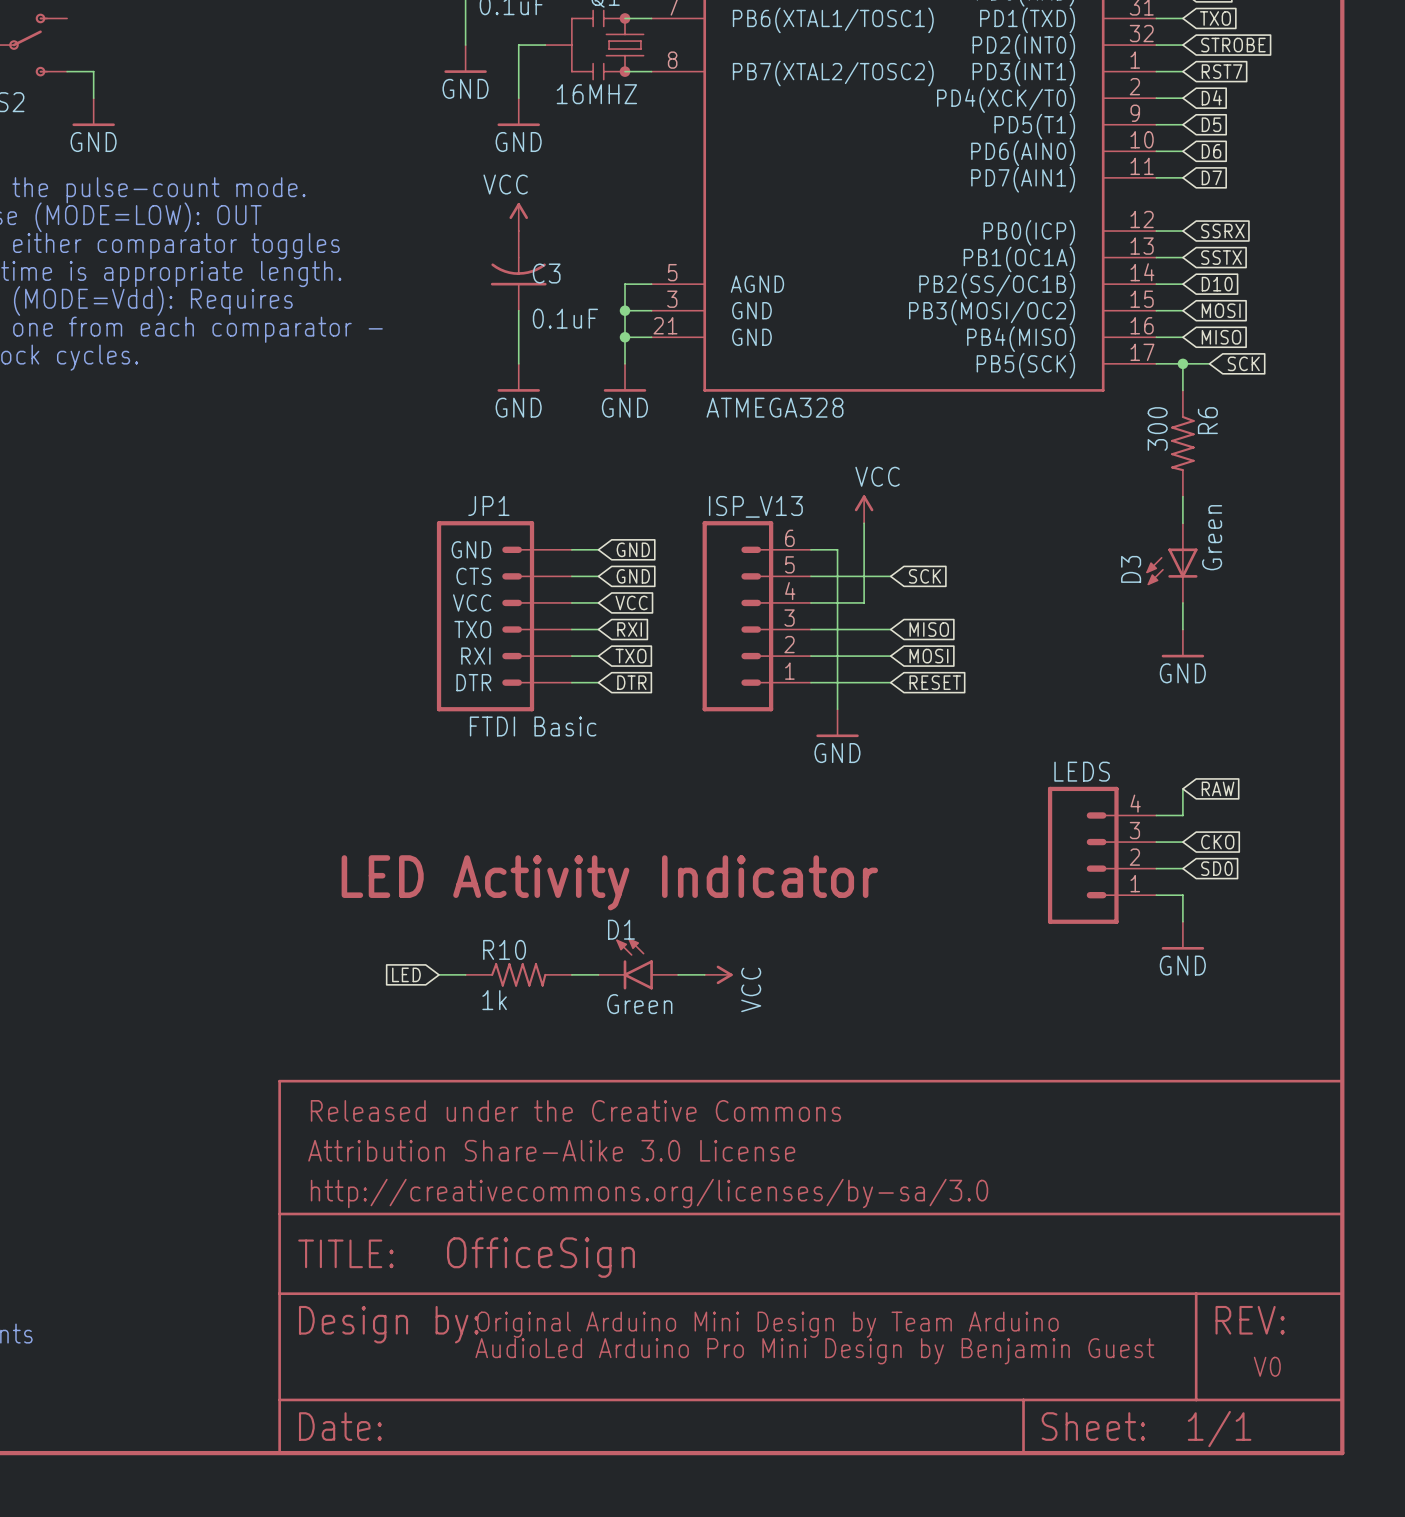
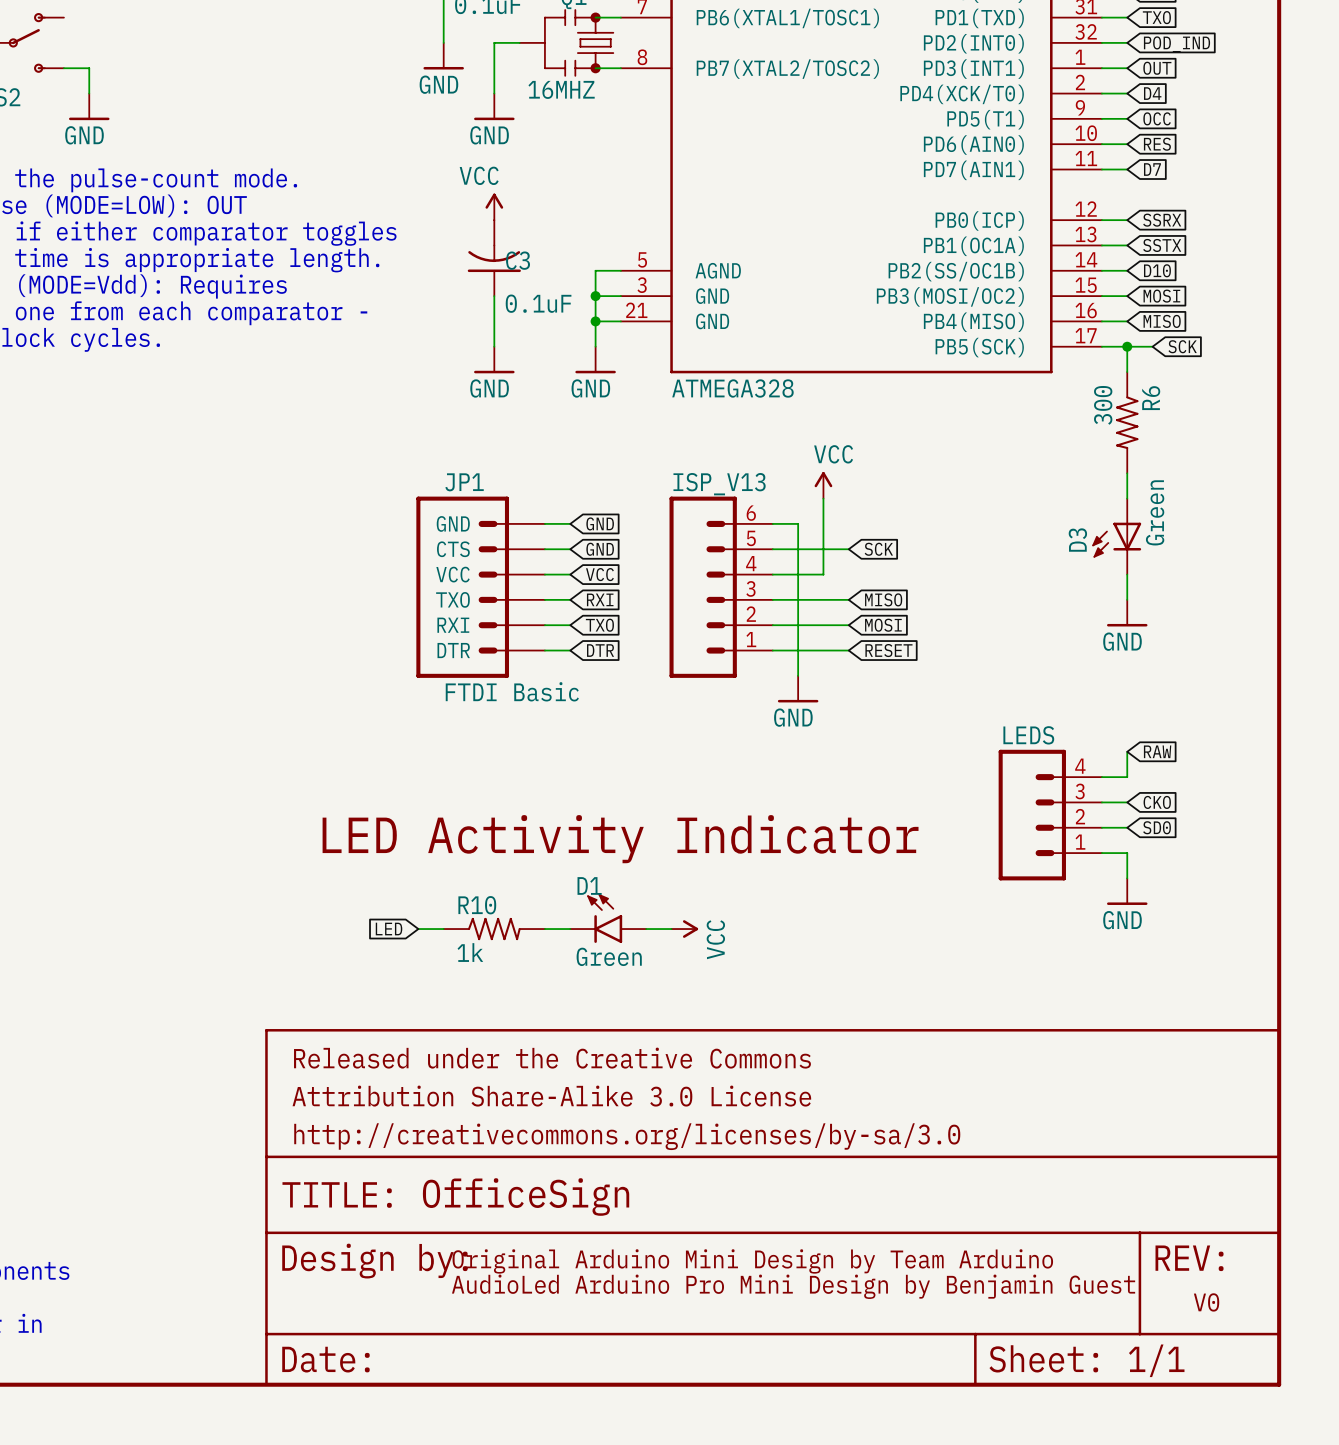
global label: STROBE (1233, 45) -> POD_IND (1176, 44)
global label: RST7 (1222, 71) -> OUT (1157, 68)
global label: D5 (1211, 124) -> OCC (1157, 118)
global label: D6 (1211, 151) -> RES (1157, 144)

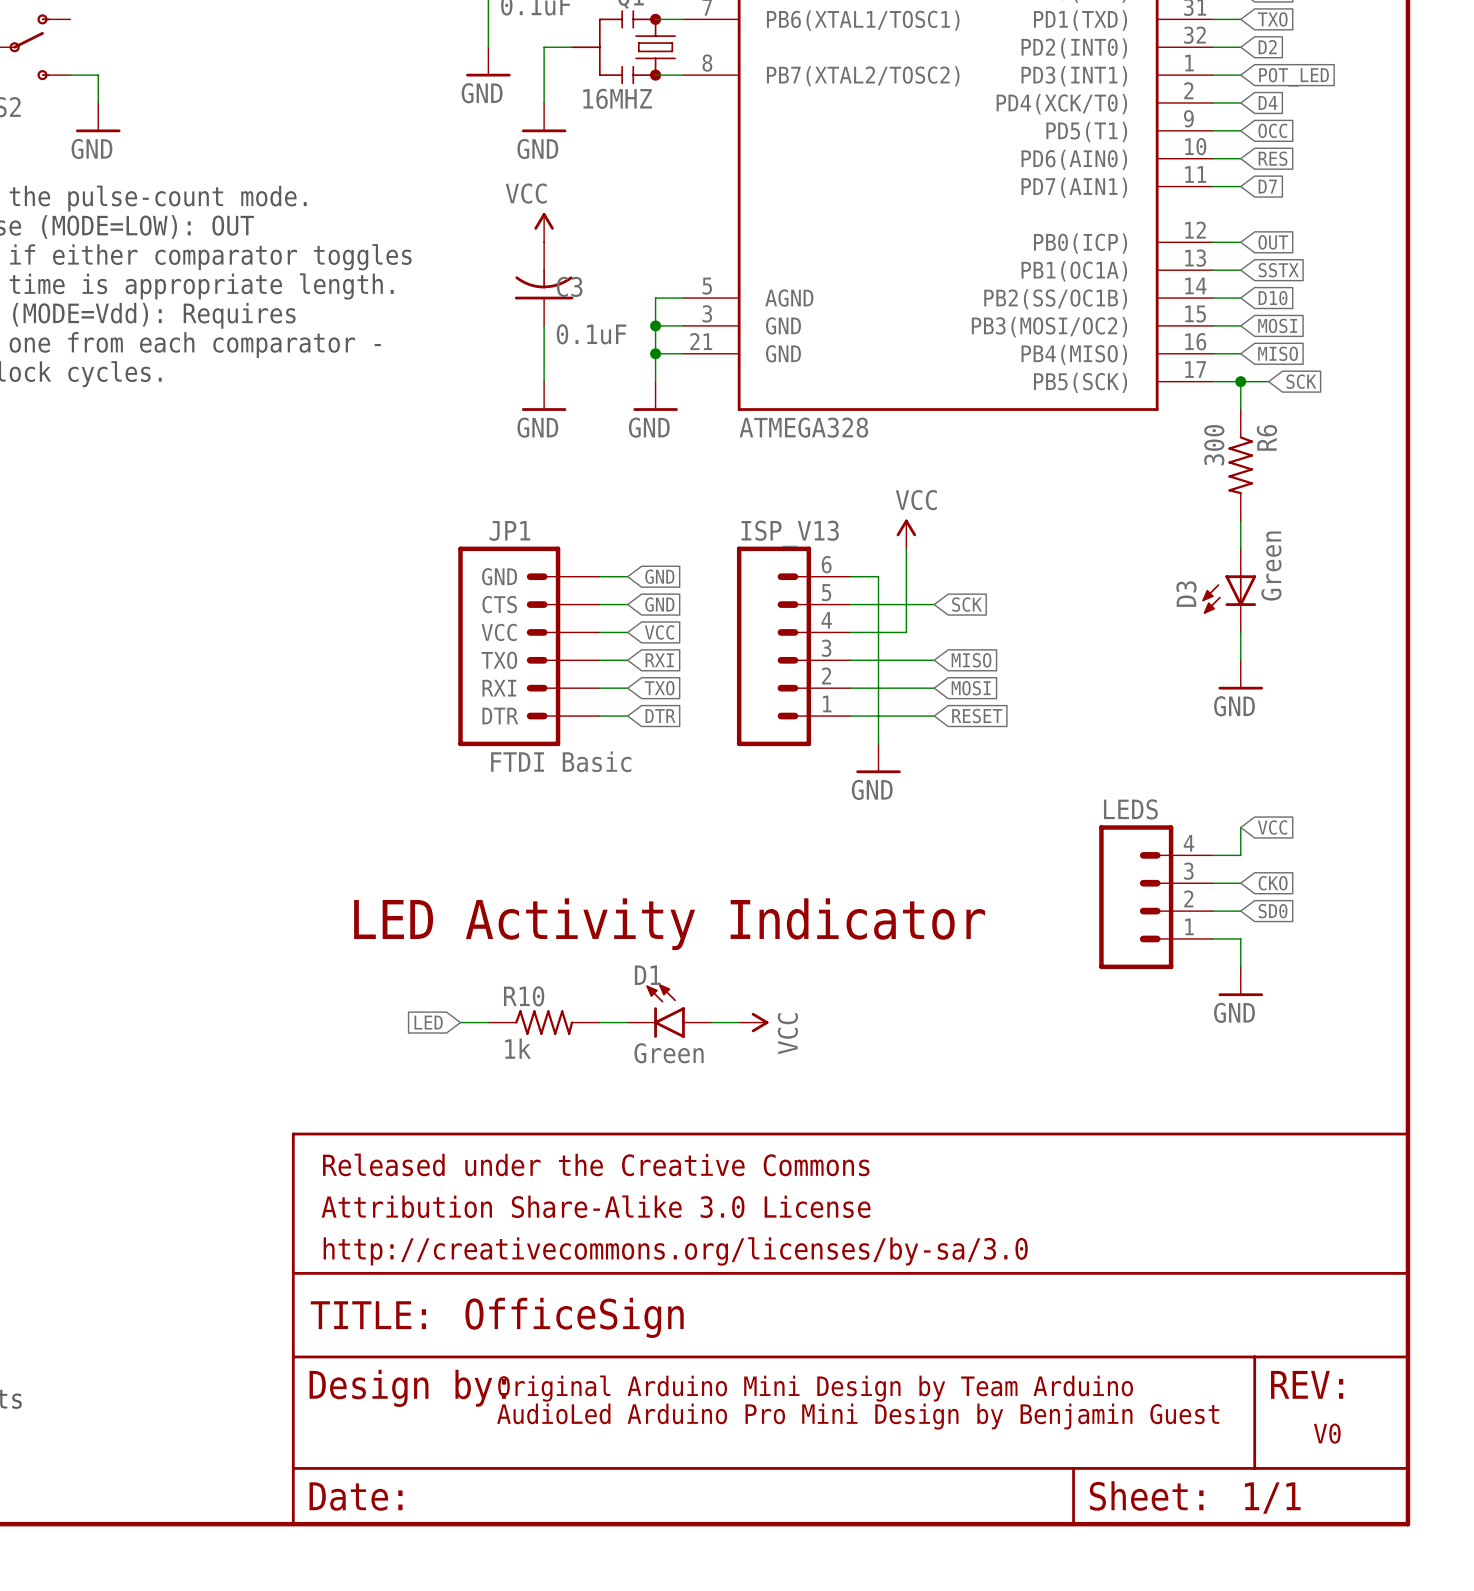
global label: POD_IND (1176, 44) -> D2 (1267, 47)
global label: OUT (1157, 68) -> POT_LED (1294, 77)
global label: SSRX (1162, 220) -> OUT (1273, 242)
global label: RAW (1157, 751) -> VCC (1272, 827)

